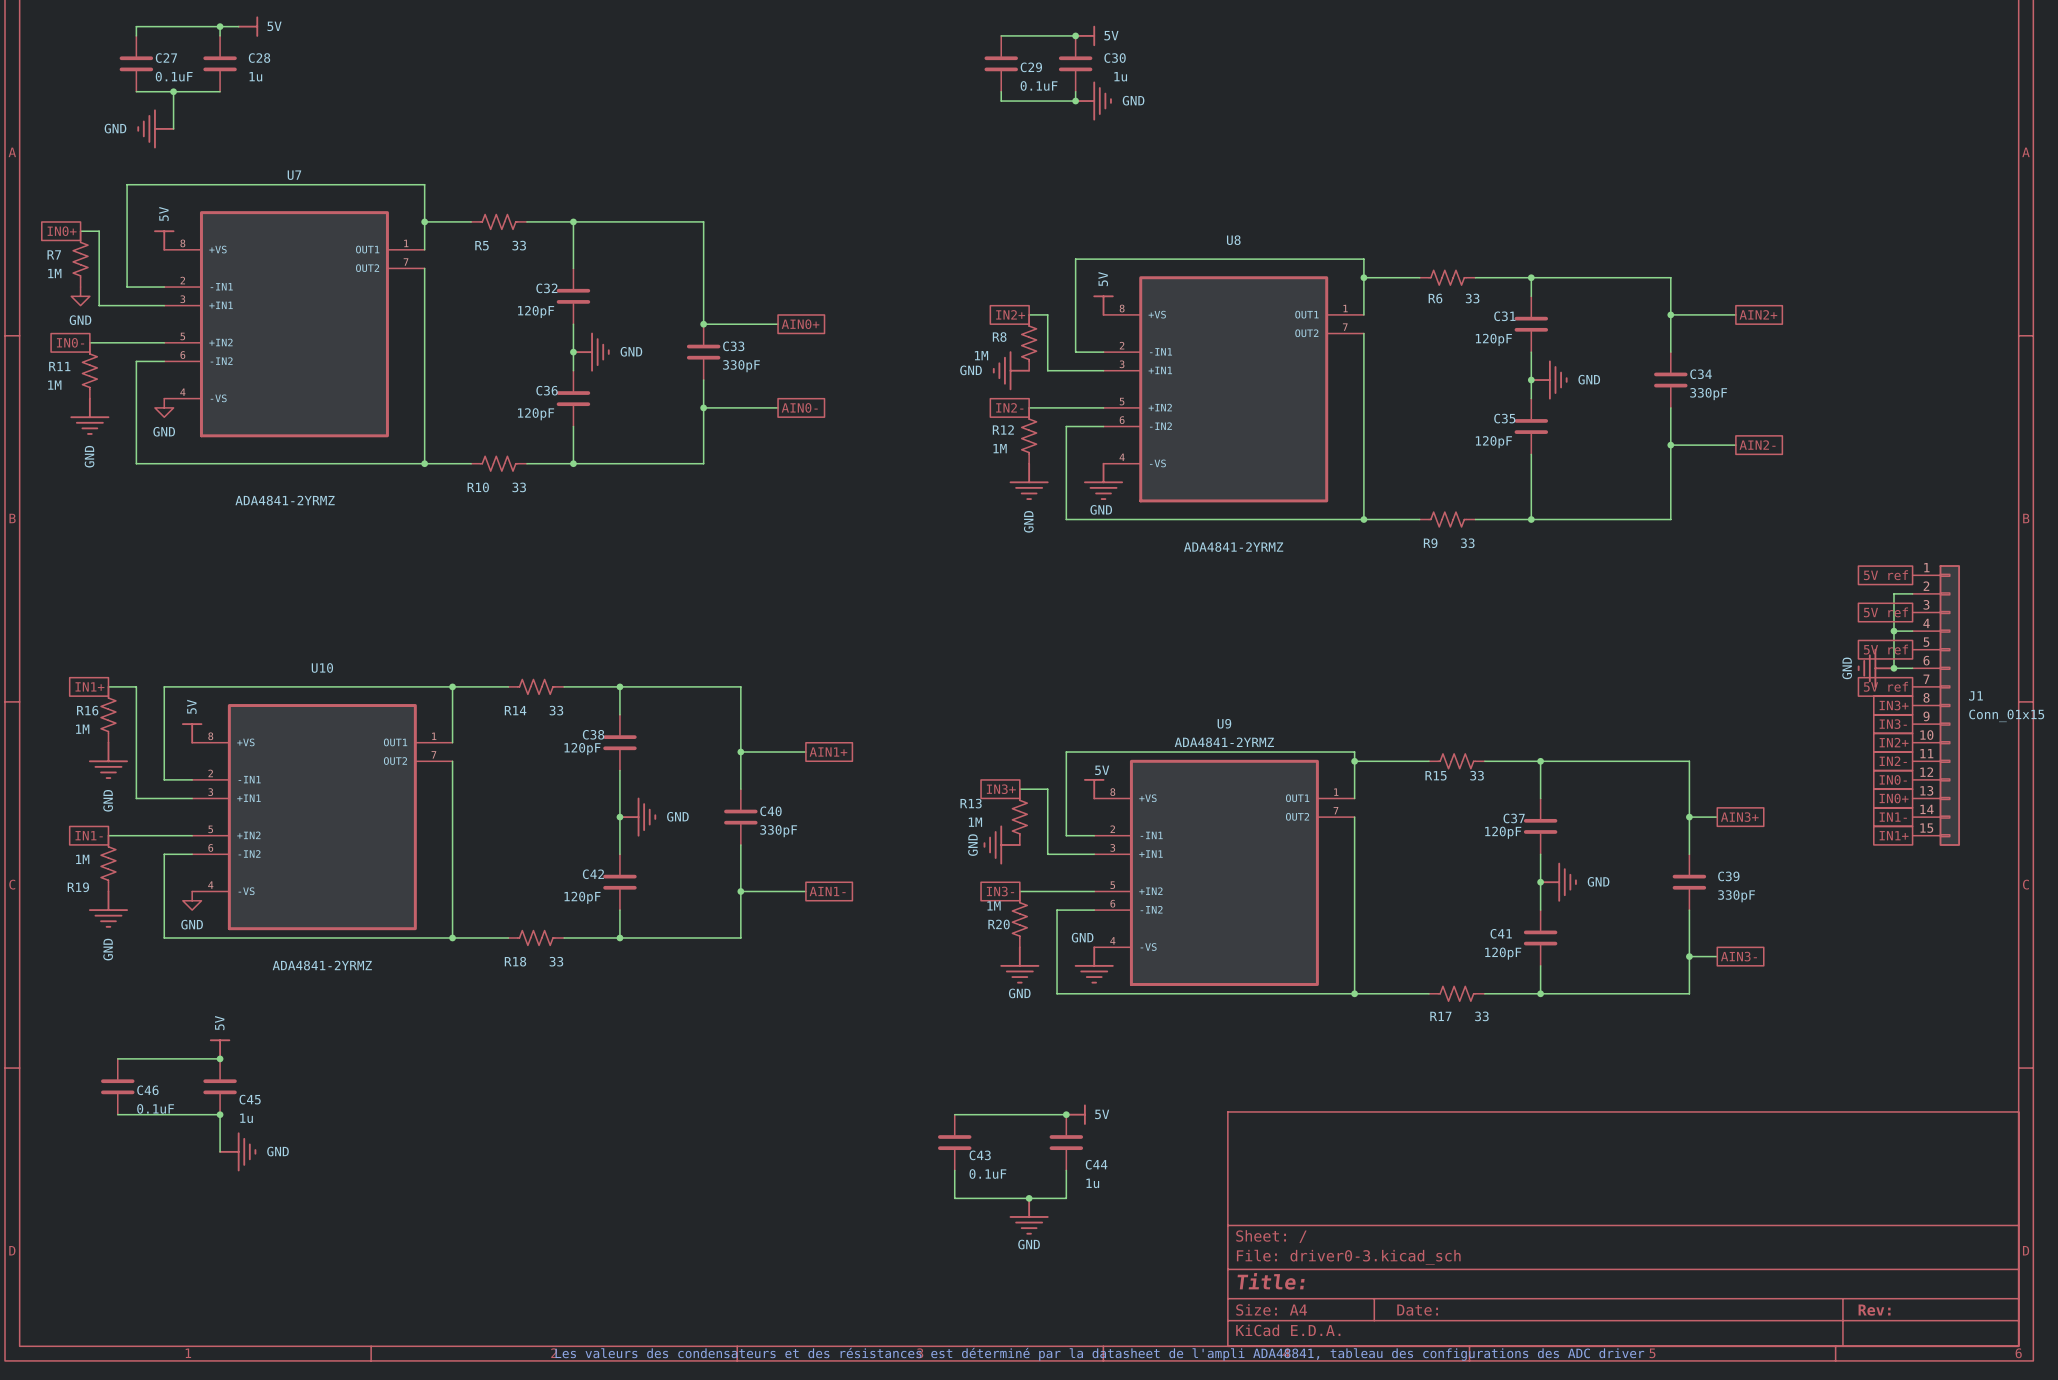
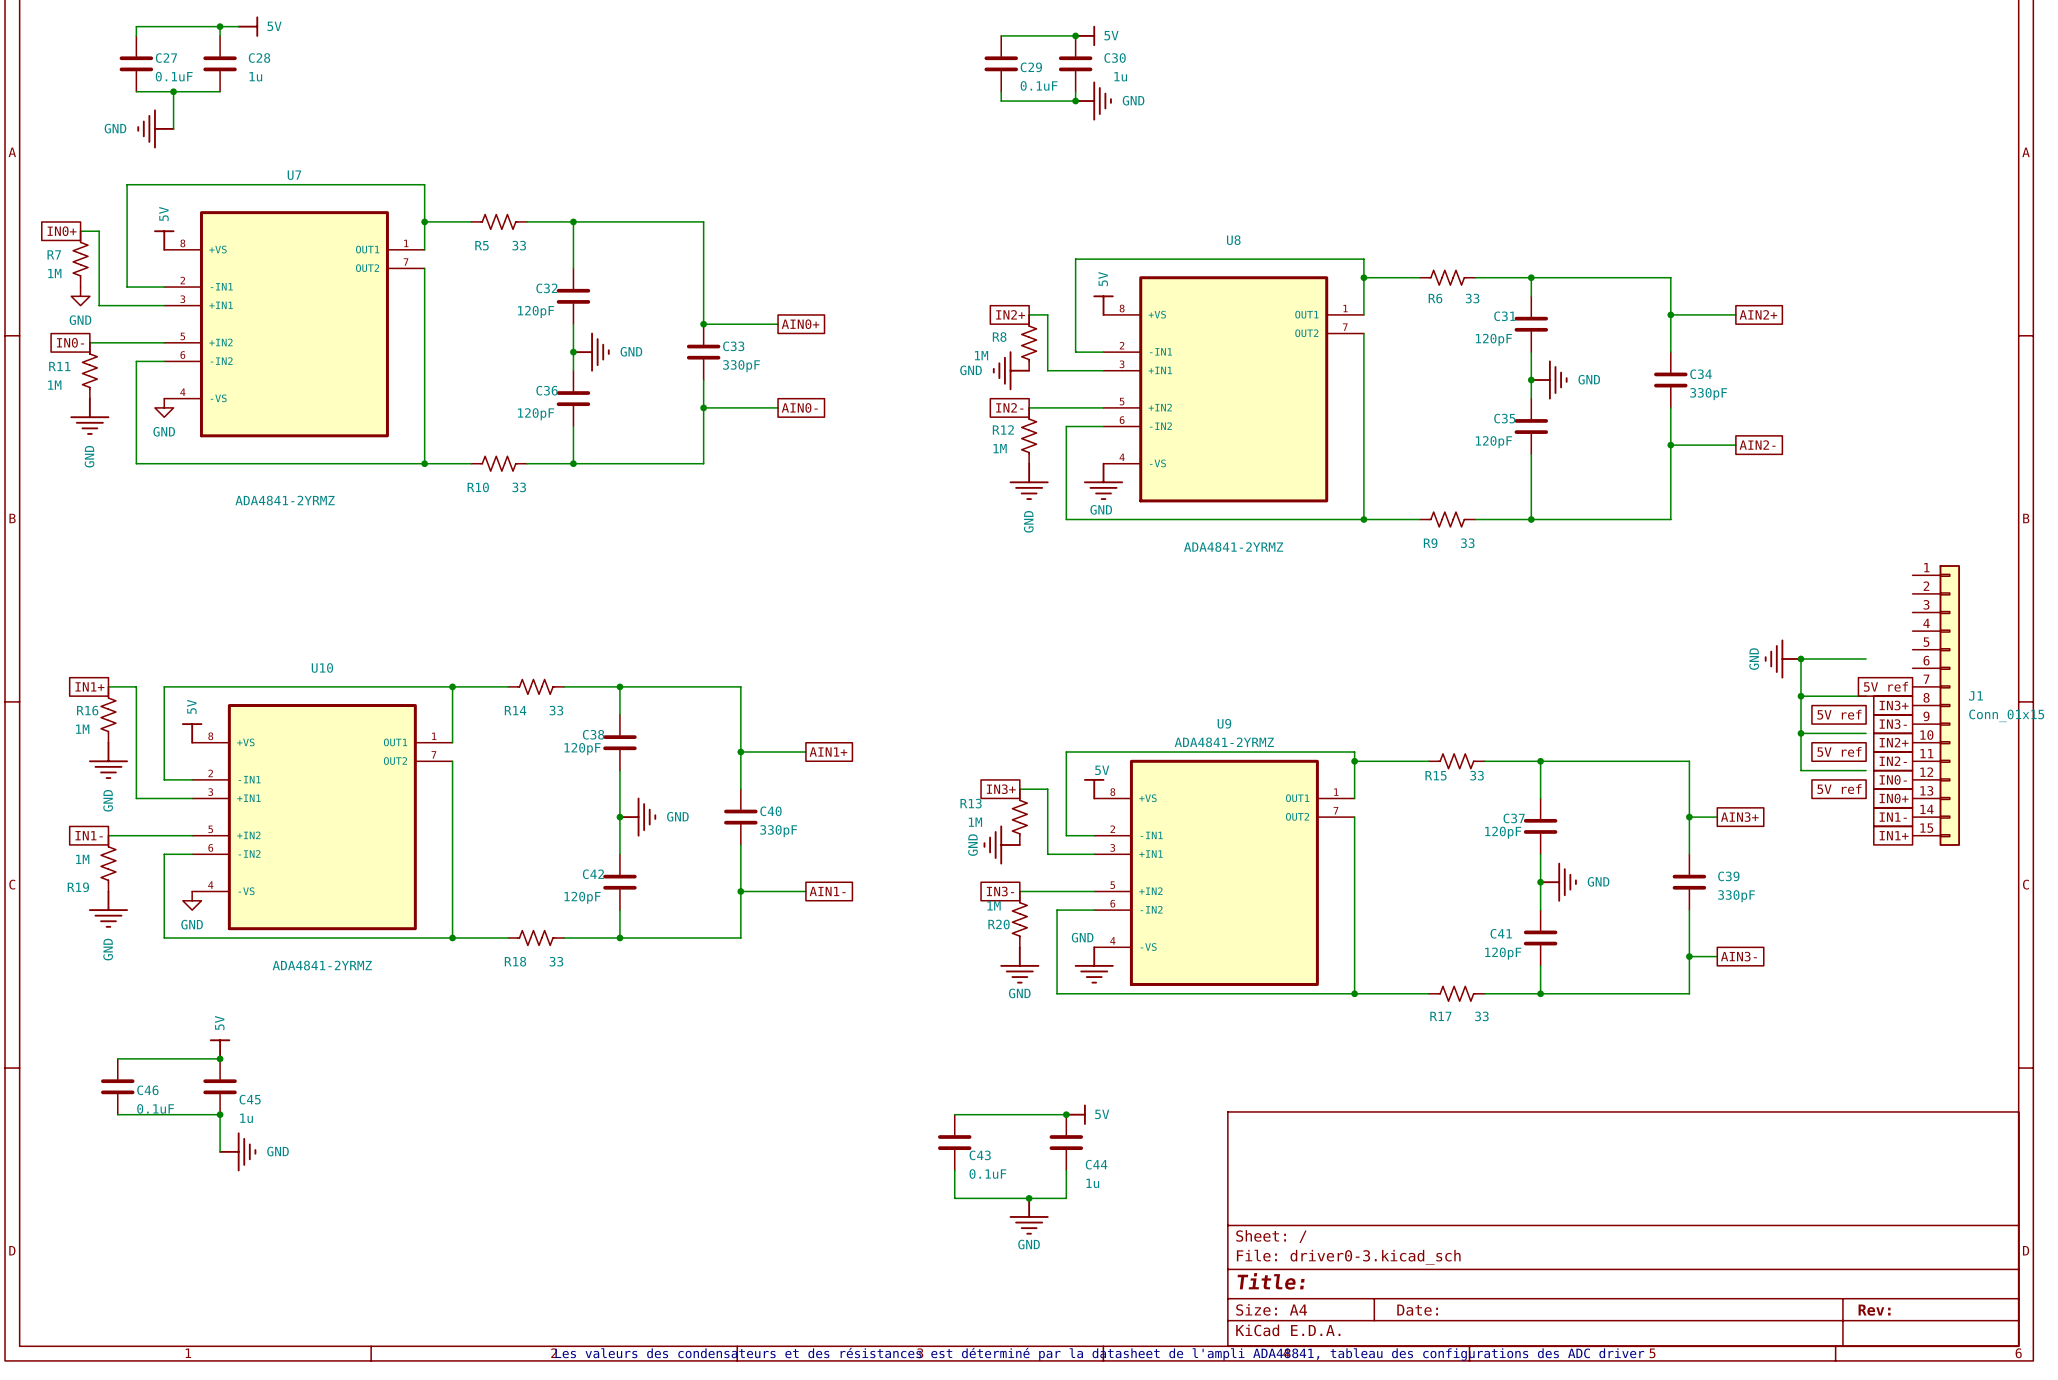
global label: 5V ref (1885, 575) -> none
wire: (1912, 593) (1893, 593) (1893, 668) (1912, 668) -> none
global label: 5V ref (1885, 612) -> none
wire: (1893, 631) (1912, 631) -> none
junction: (1893, 631) -> none
global label: 5V ref (1885, 649) -> none
junction: none -> (1800, 659)
wire: none -> (1866, 659) (1800, 659) (1800, 770) (1866, 770)
power symbol position: GND (1876, 668) -> GND (1783, 659)
junction: (1893, 668) -> none
wire: none -> (1800, 696) (1866, 696)
junction: none -> (1800, 696)
global label: none -> 5V ref (1839, 714)
wire: none -> (1800, 733) (1866, 733)
junction: none -> (1800, 733)
global label: none -> 5V ref (1839, 751)
global label: none -> 5V ref (1839, 789)

